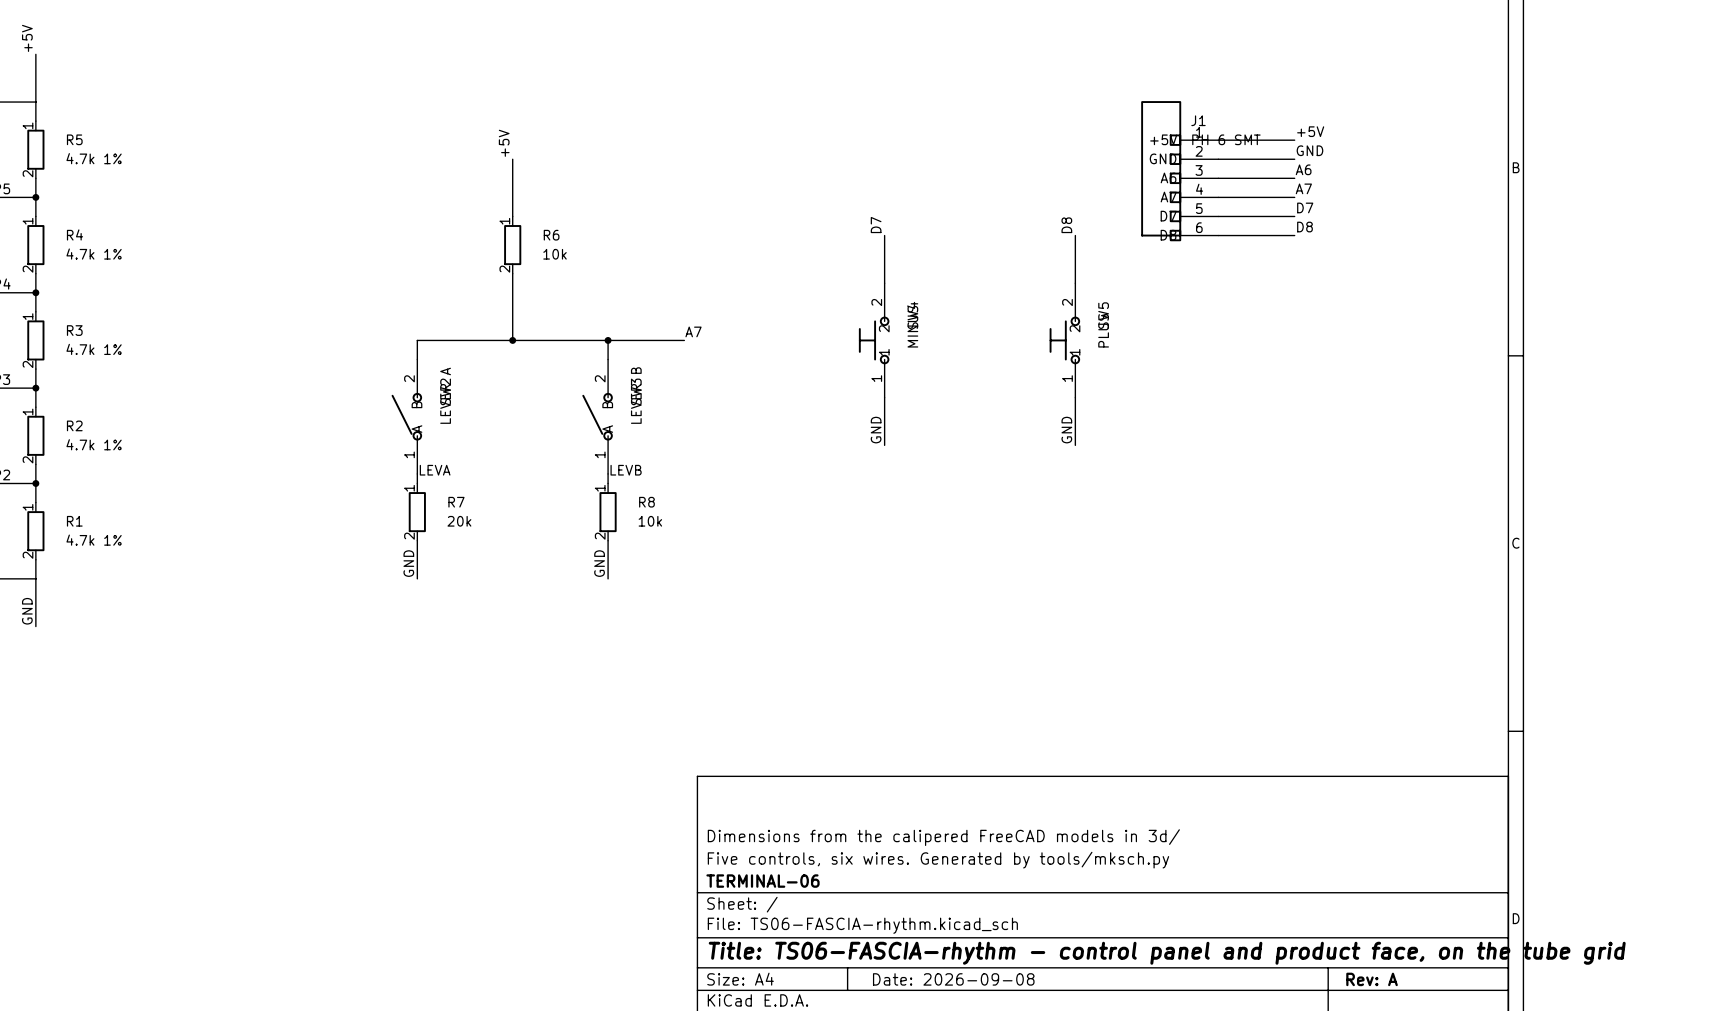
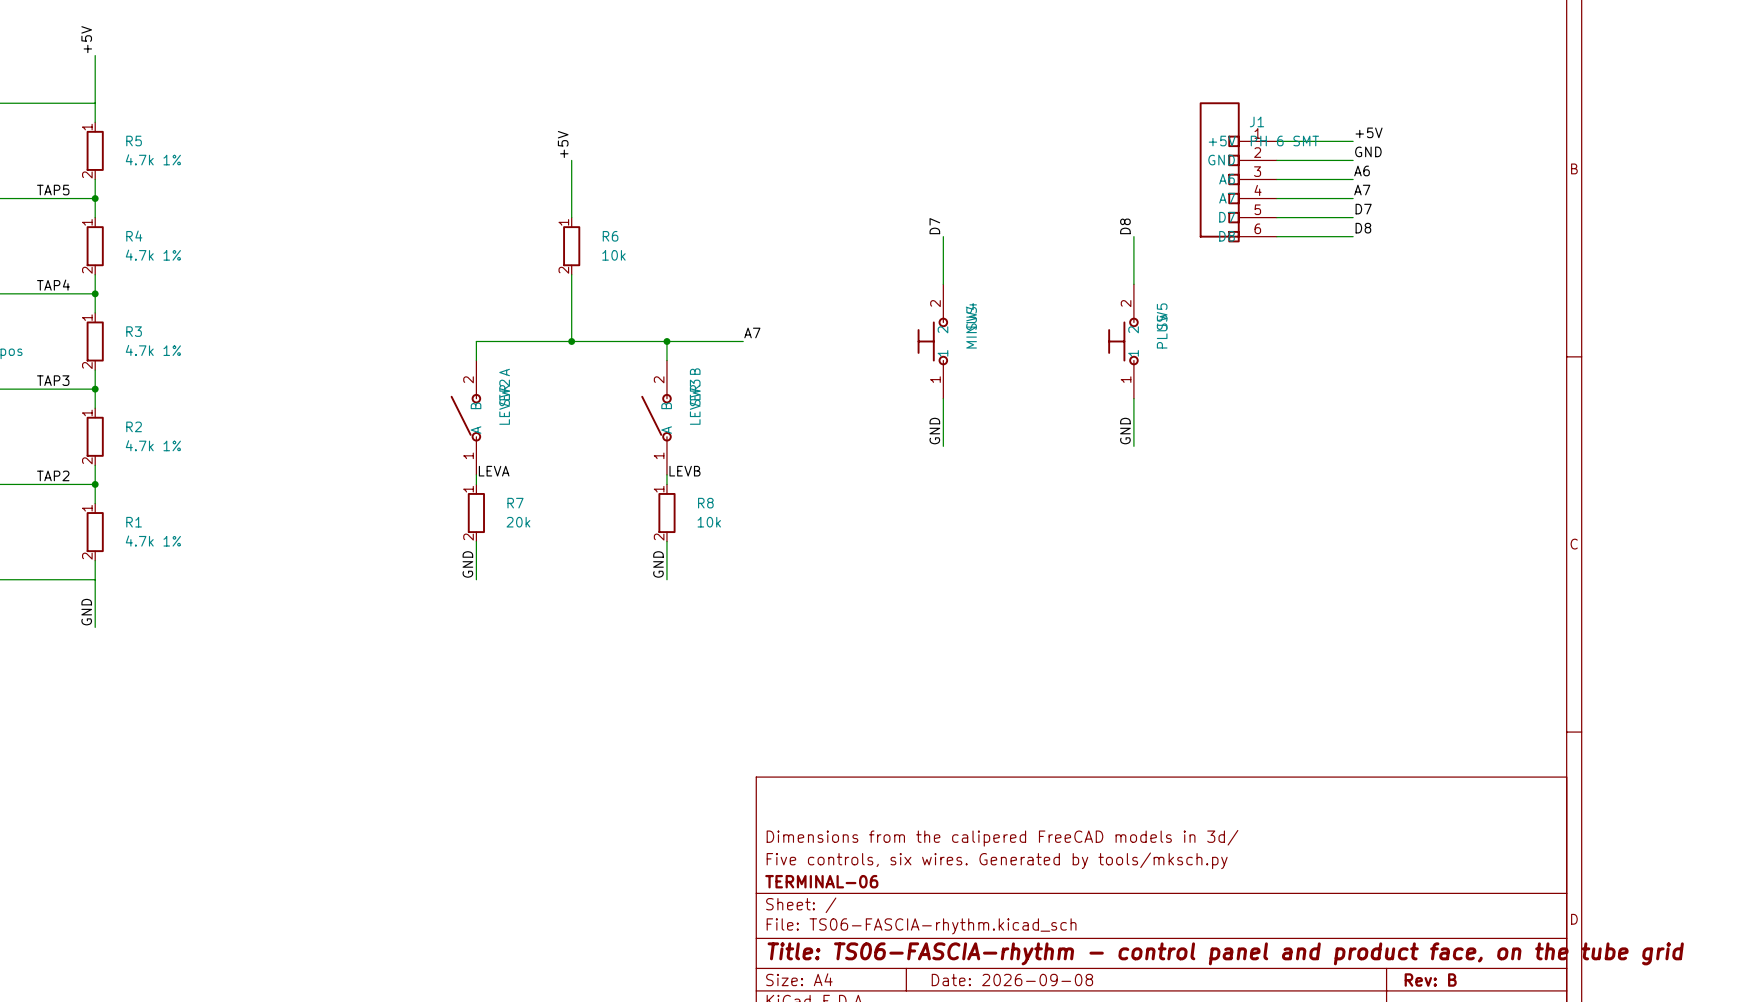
title block: Rev: A (1372, 979) -> Rev: B (1430, 980)

